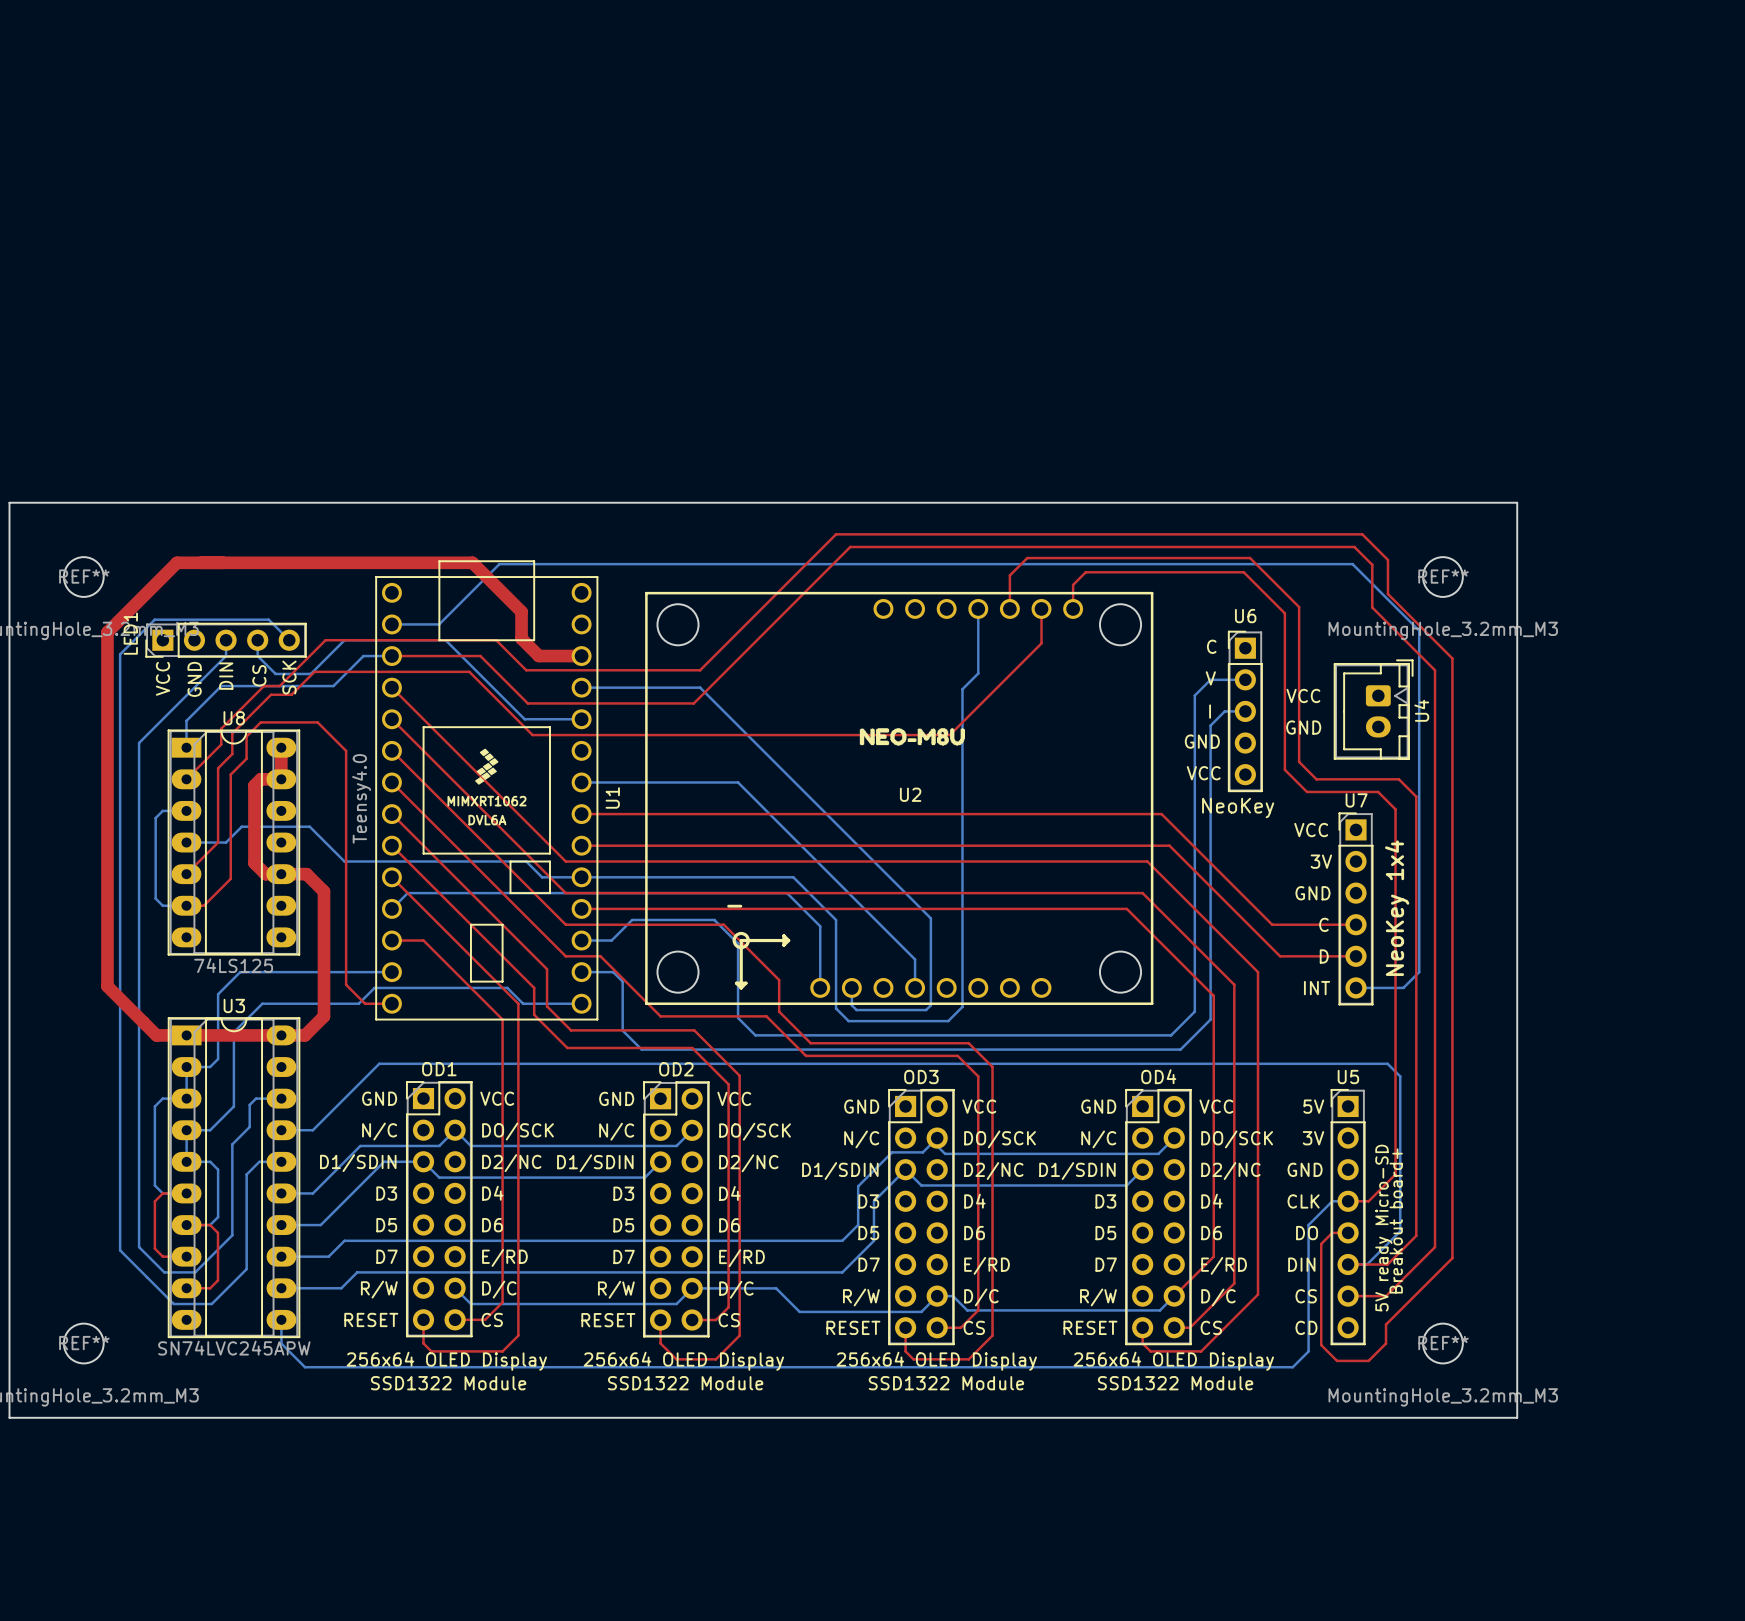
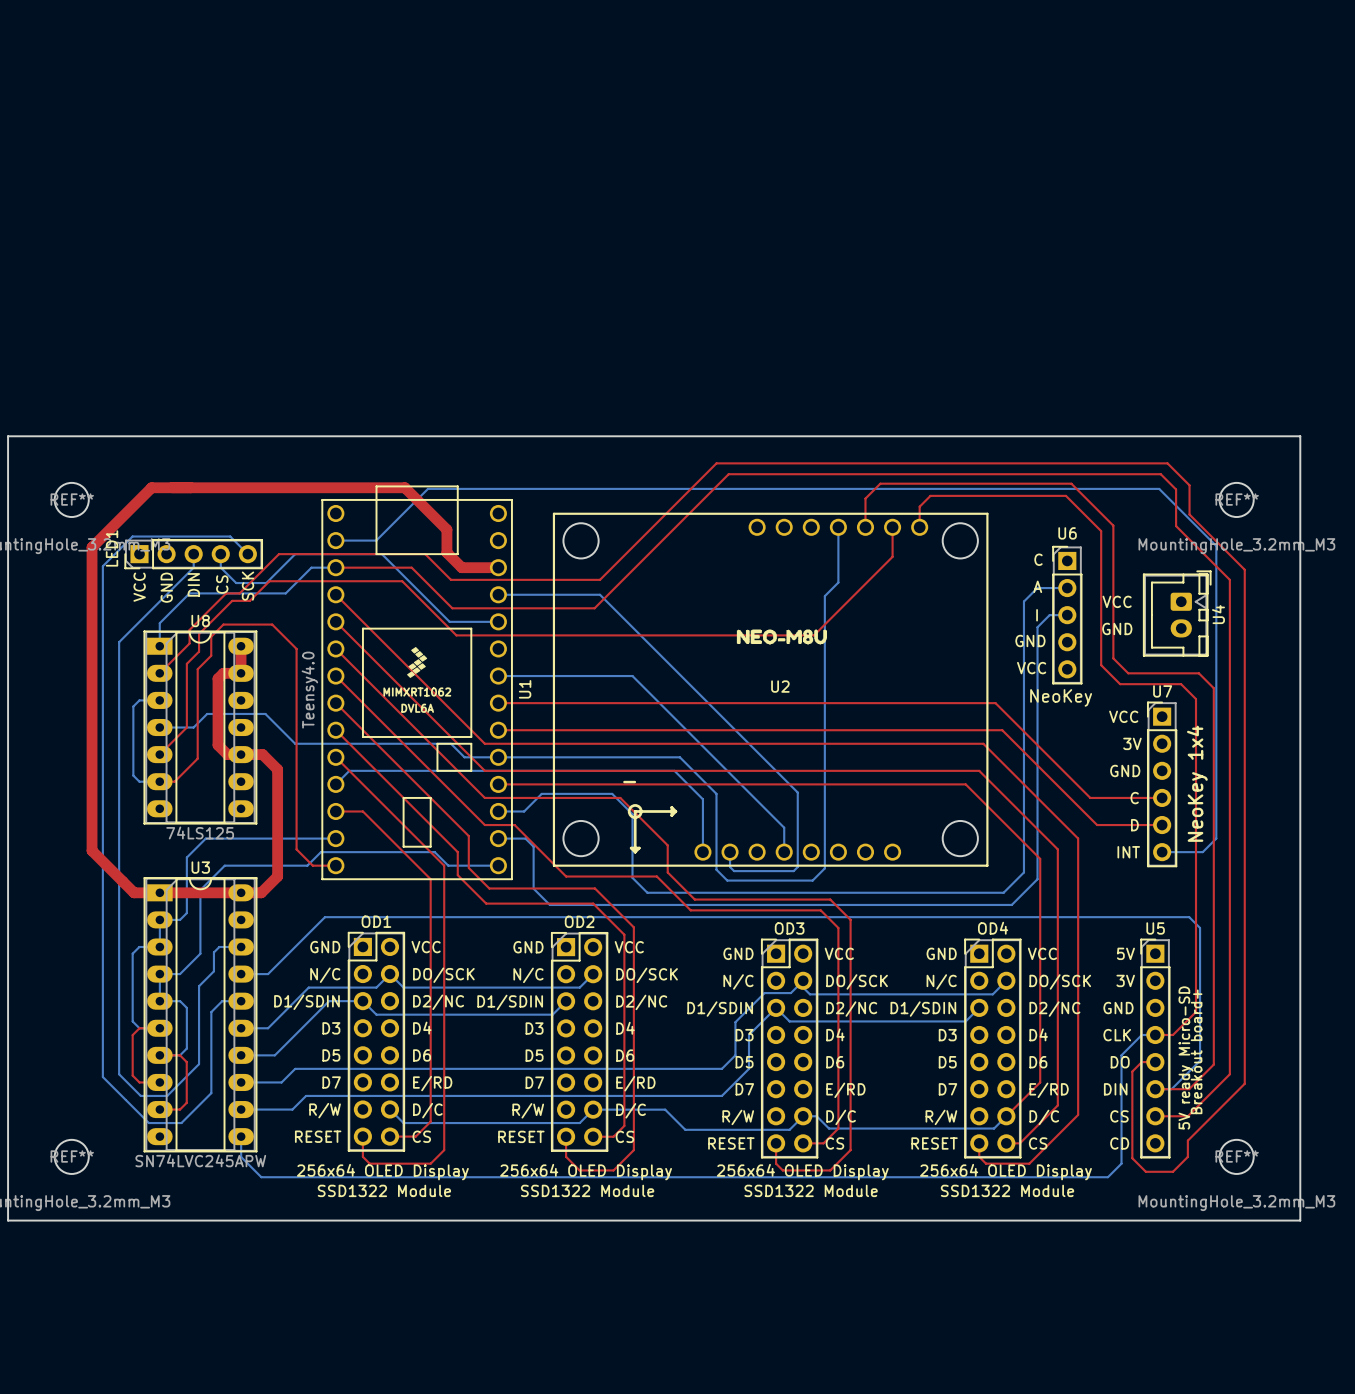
U6 text: V (1210, 678) -> A (1037, 586)

